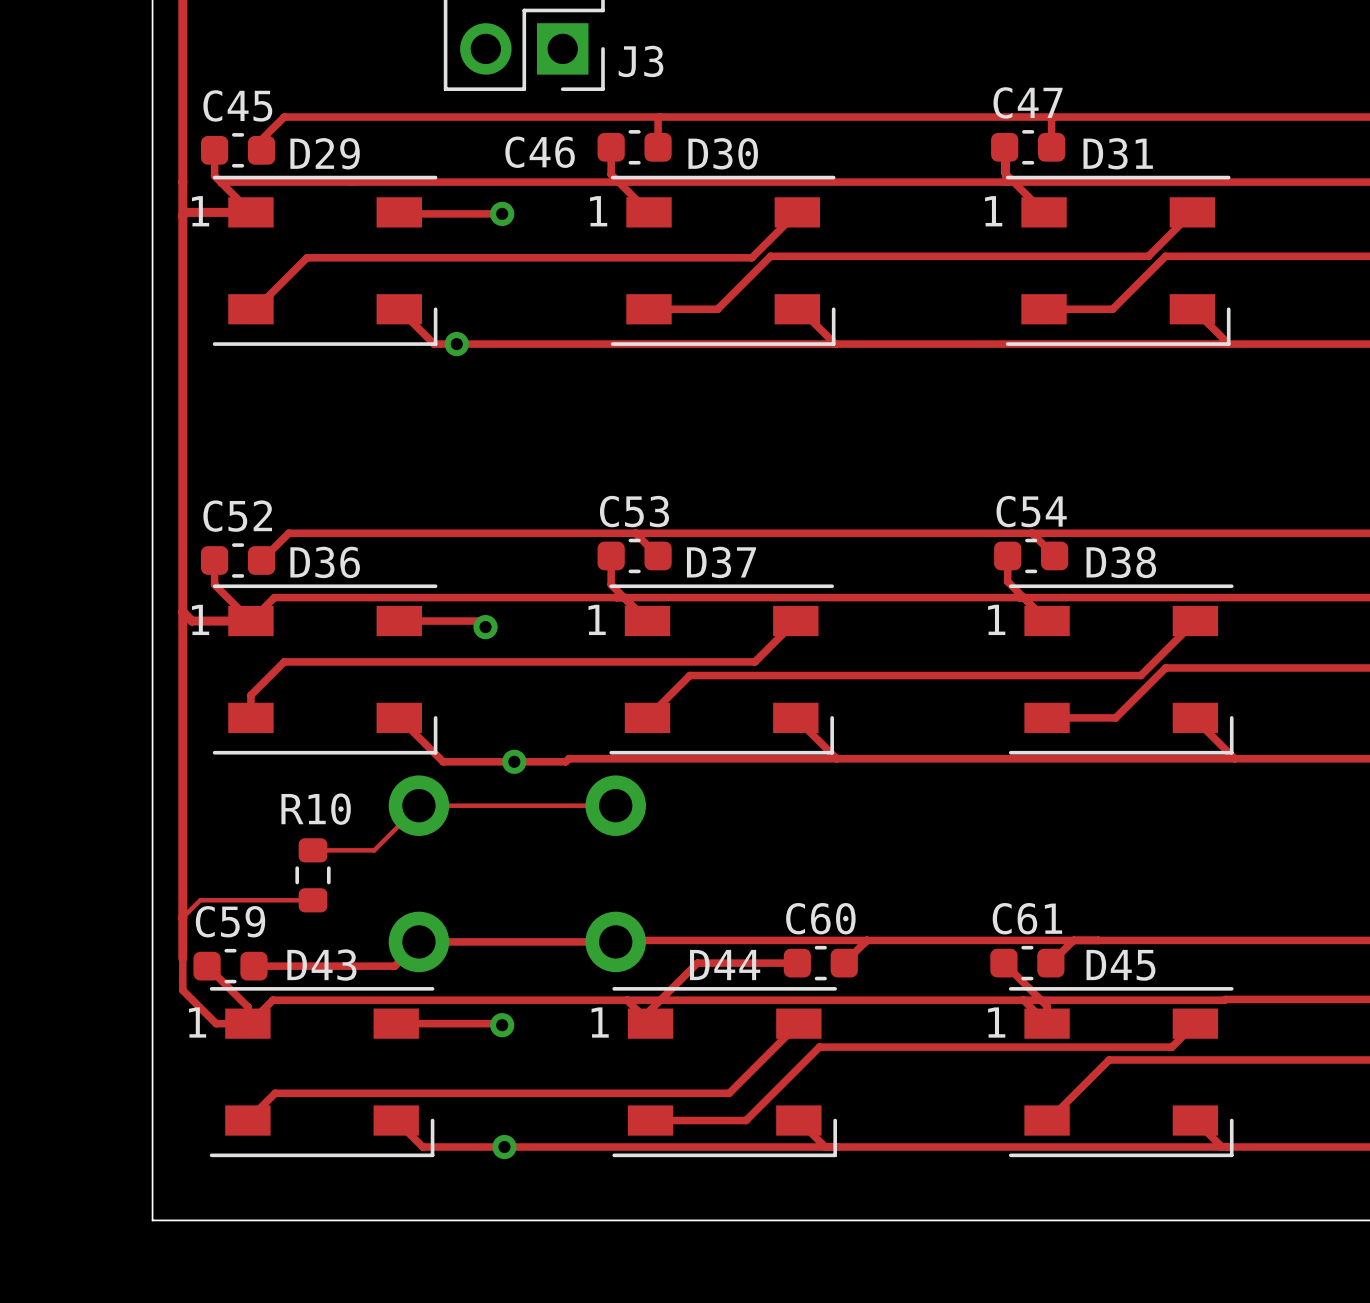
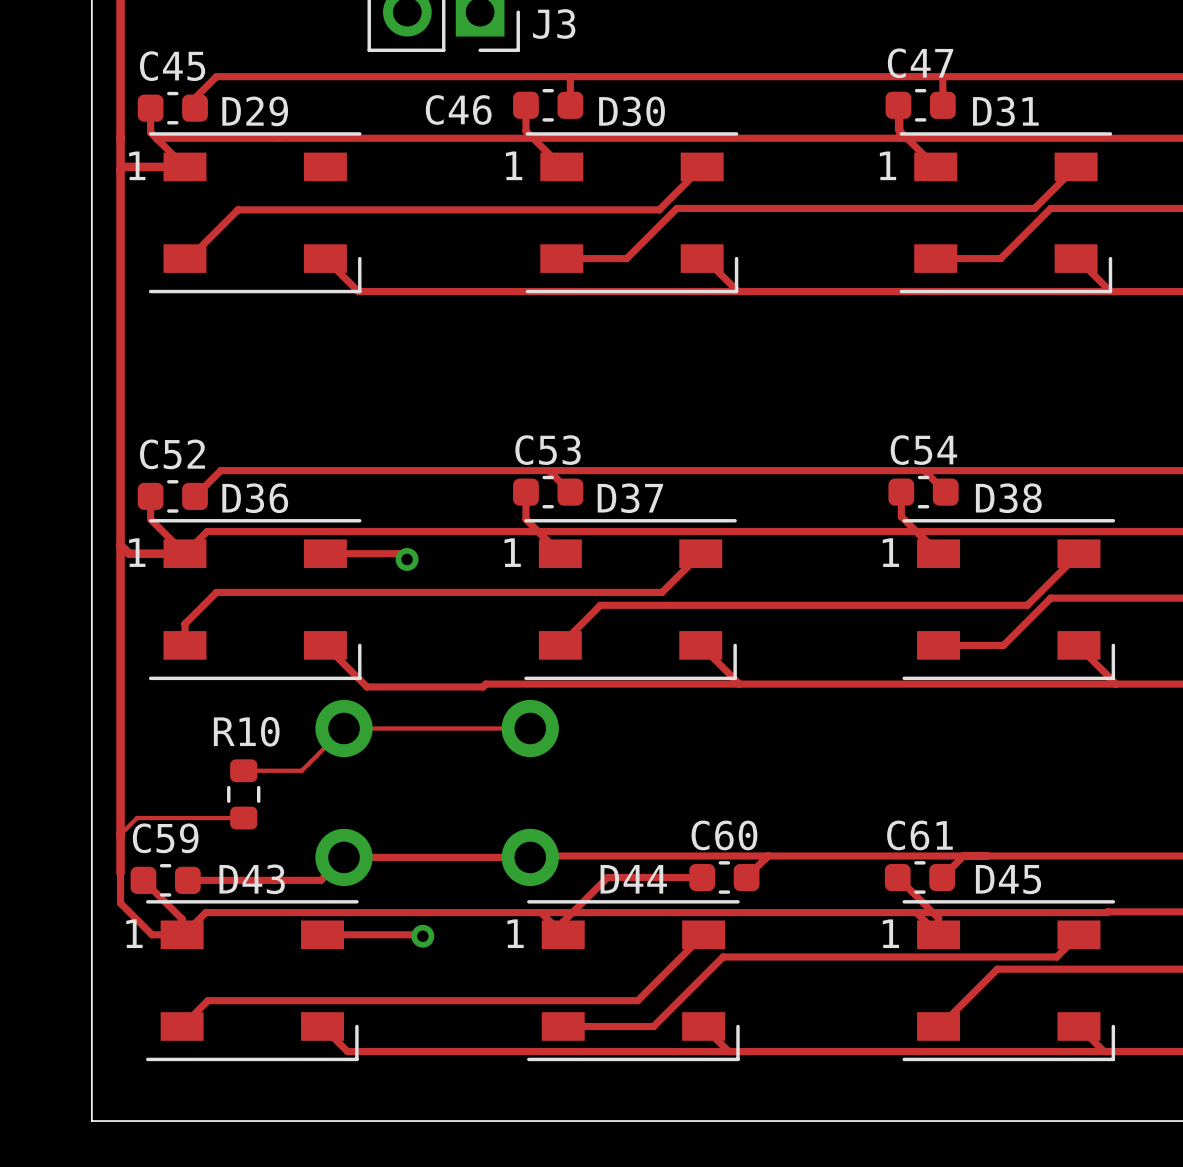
track: (399, 212) (502, 213) -> none
via: (502, 213) -> none
via: (456, 344) -> none
via: (514, 761) -> none
via: (504, 1147) -> none

